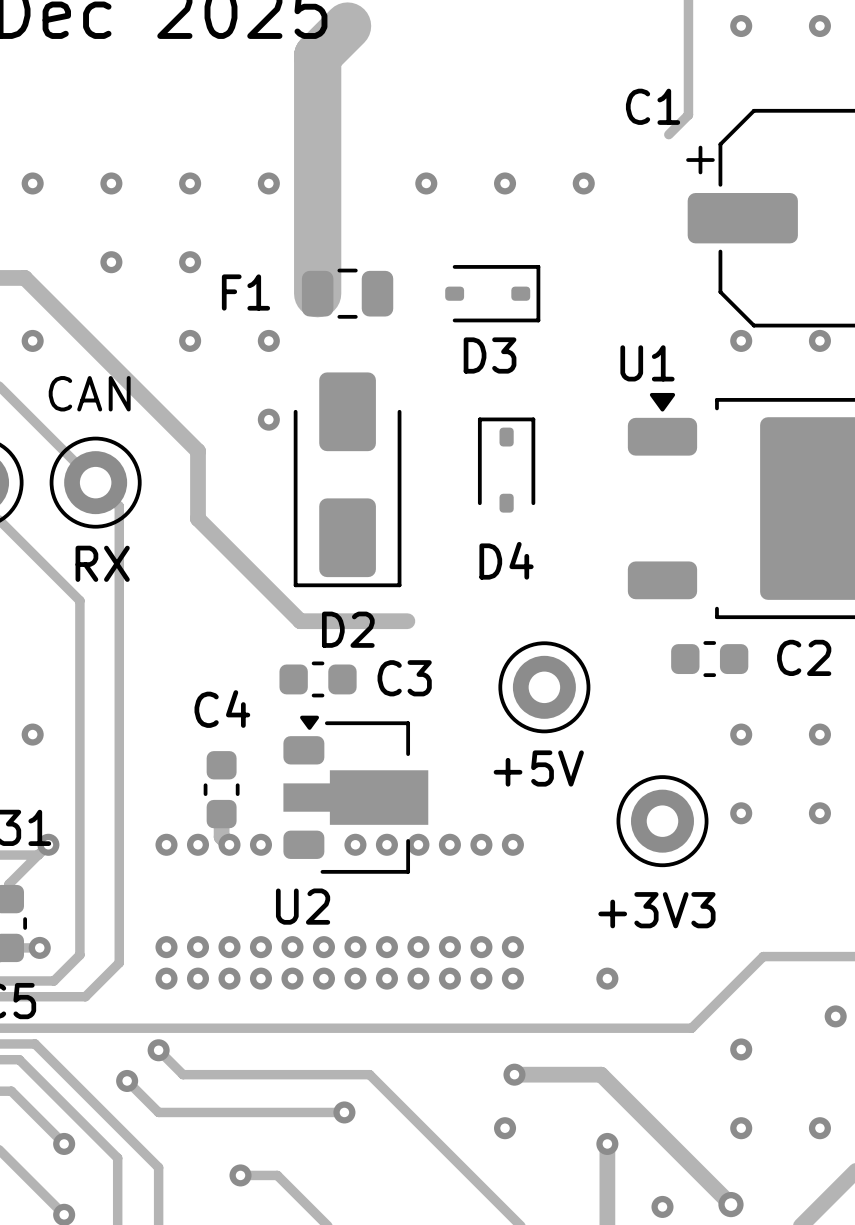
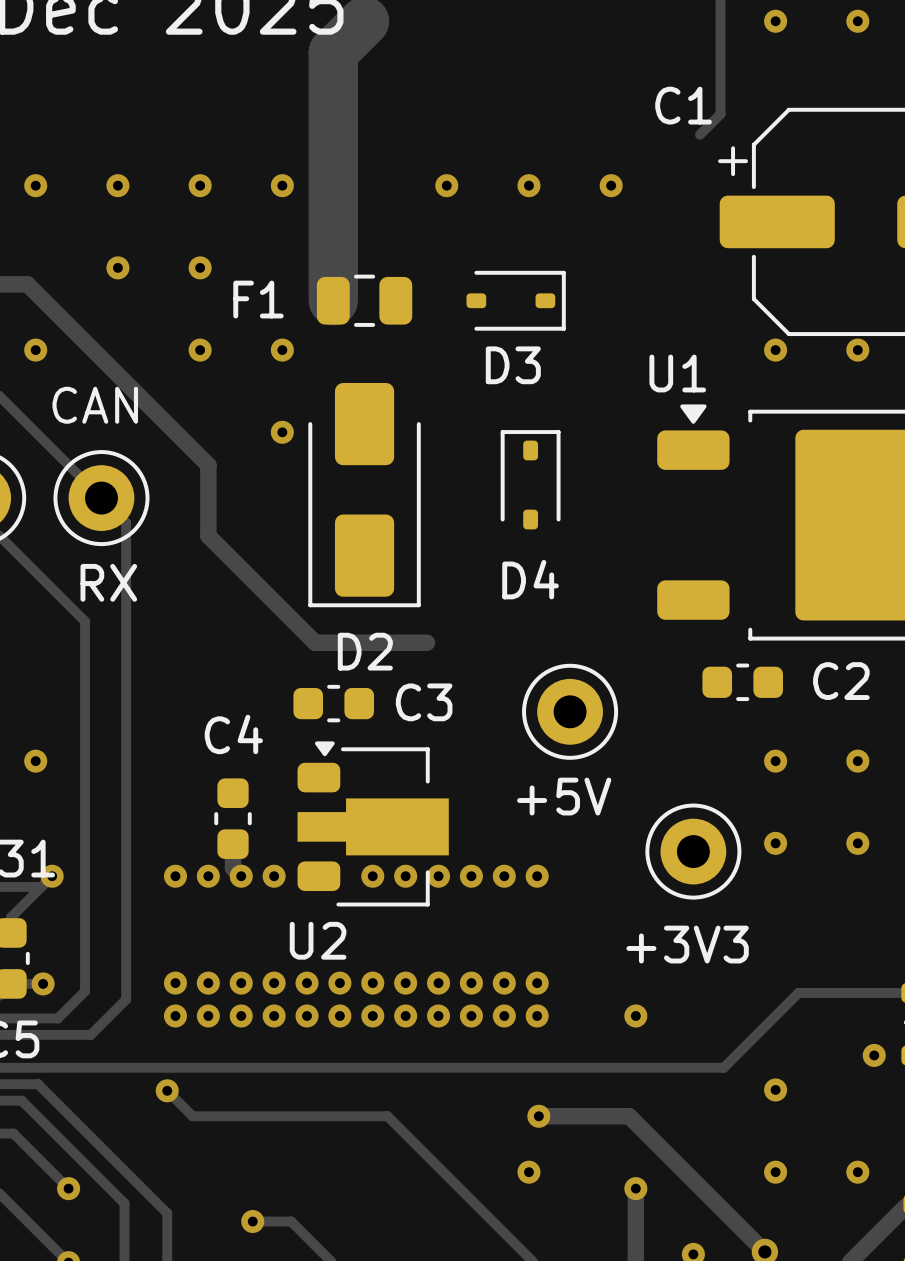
track: (127, 1080) (158, 1112) (344, 1112) -> none
via: (127, 1080) -> none
via: (344, 1112) -> none

